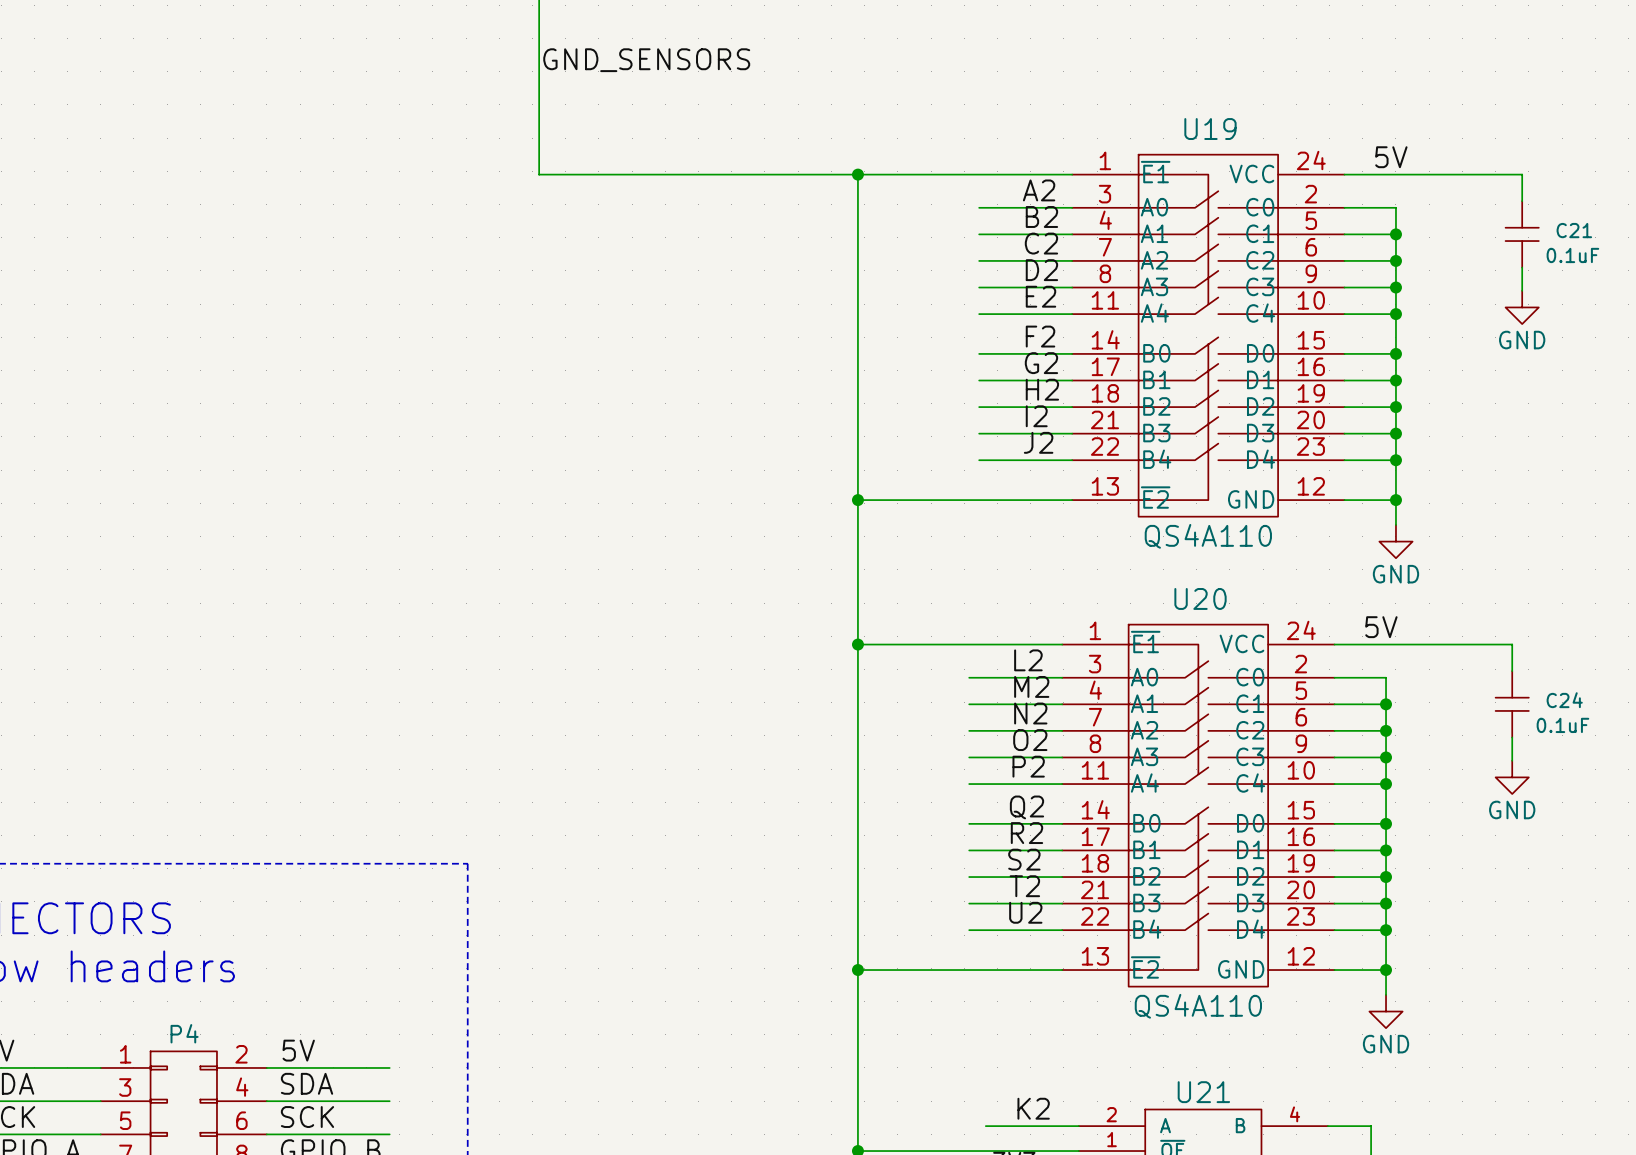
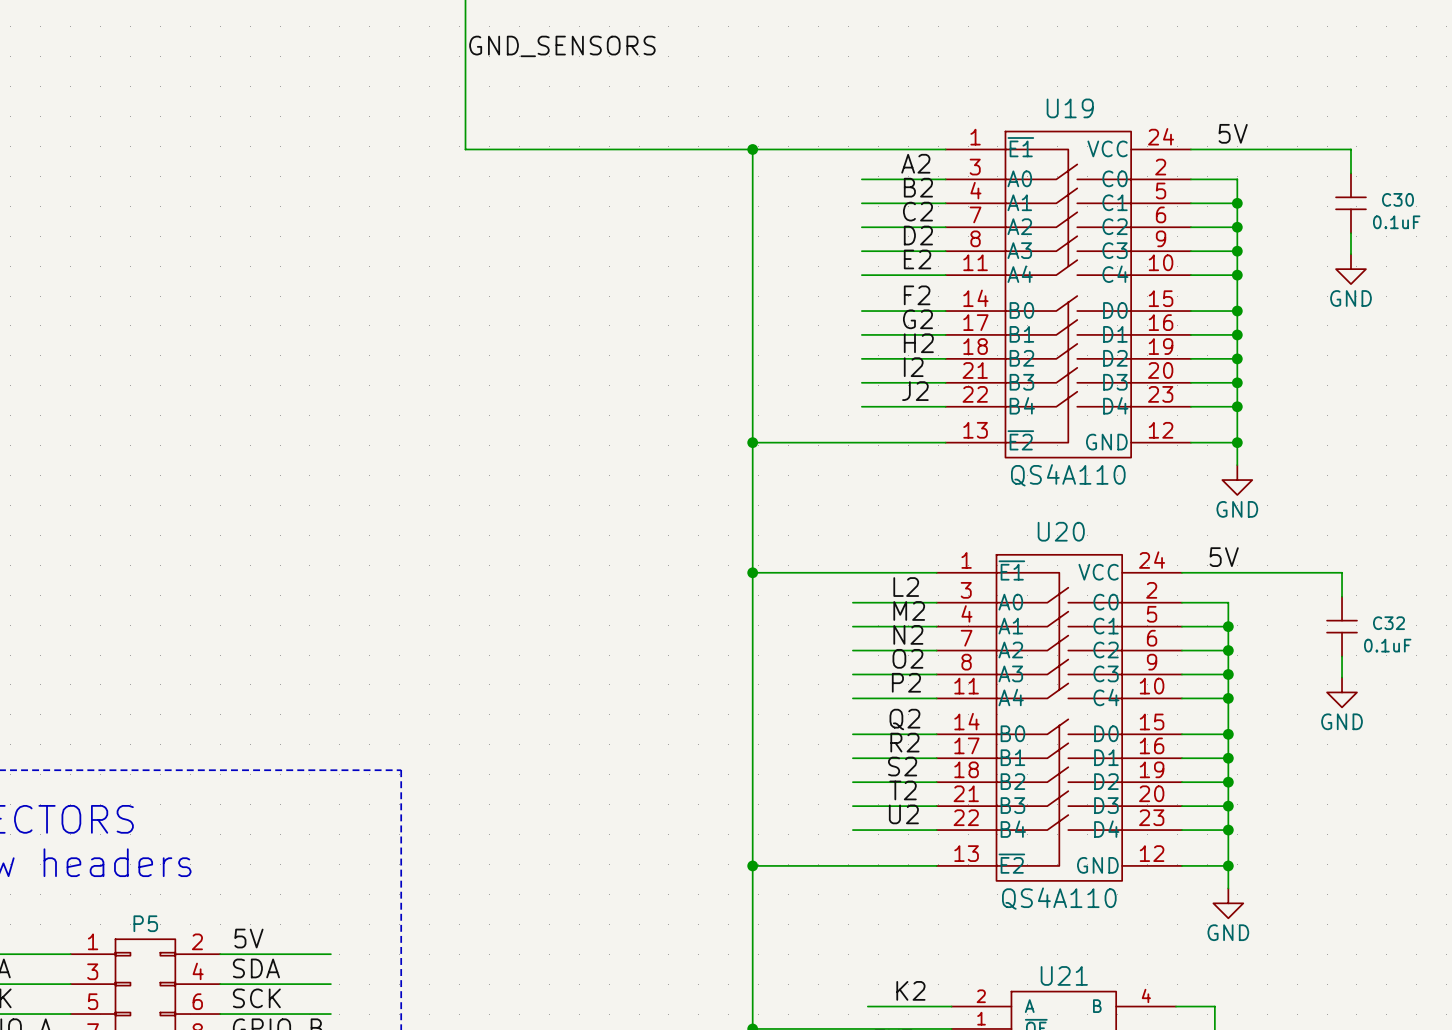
C21 name: C21 (1574, 230) -> C30 (1397, 199)
C24 name: C24 (1564, 700) -> C32 (1389, 623)
P4 name: P4 (184, 1033) -> P5 (145, 923)

